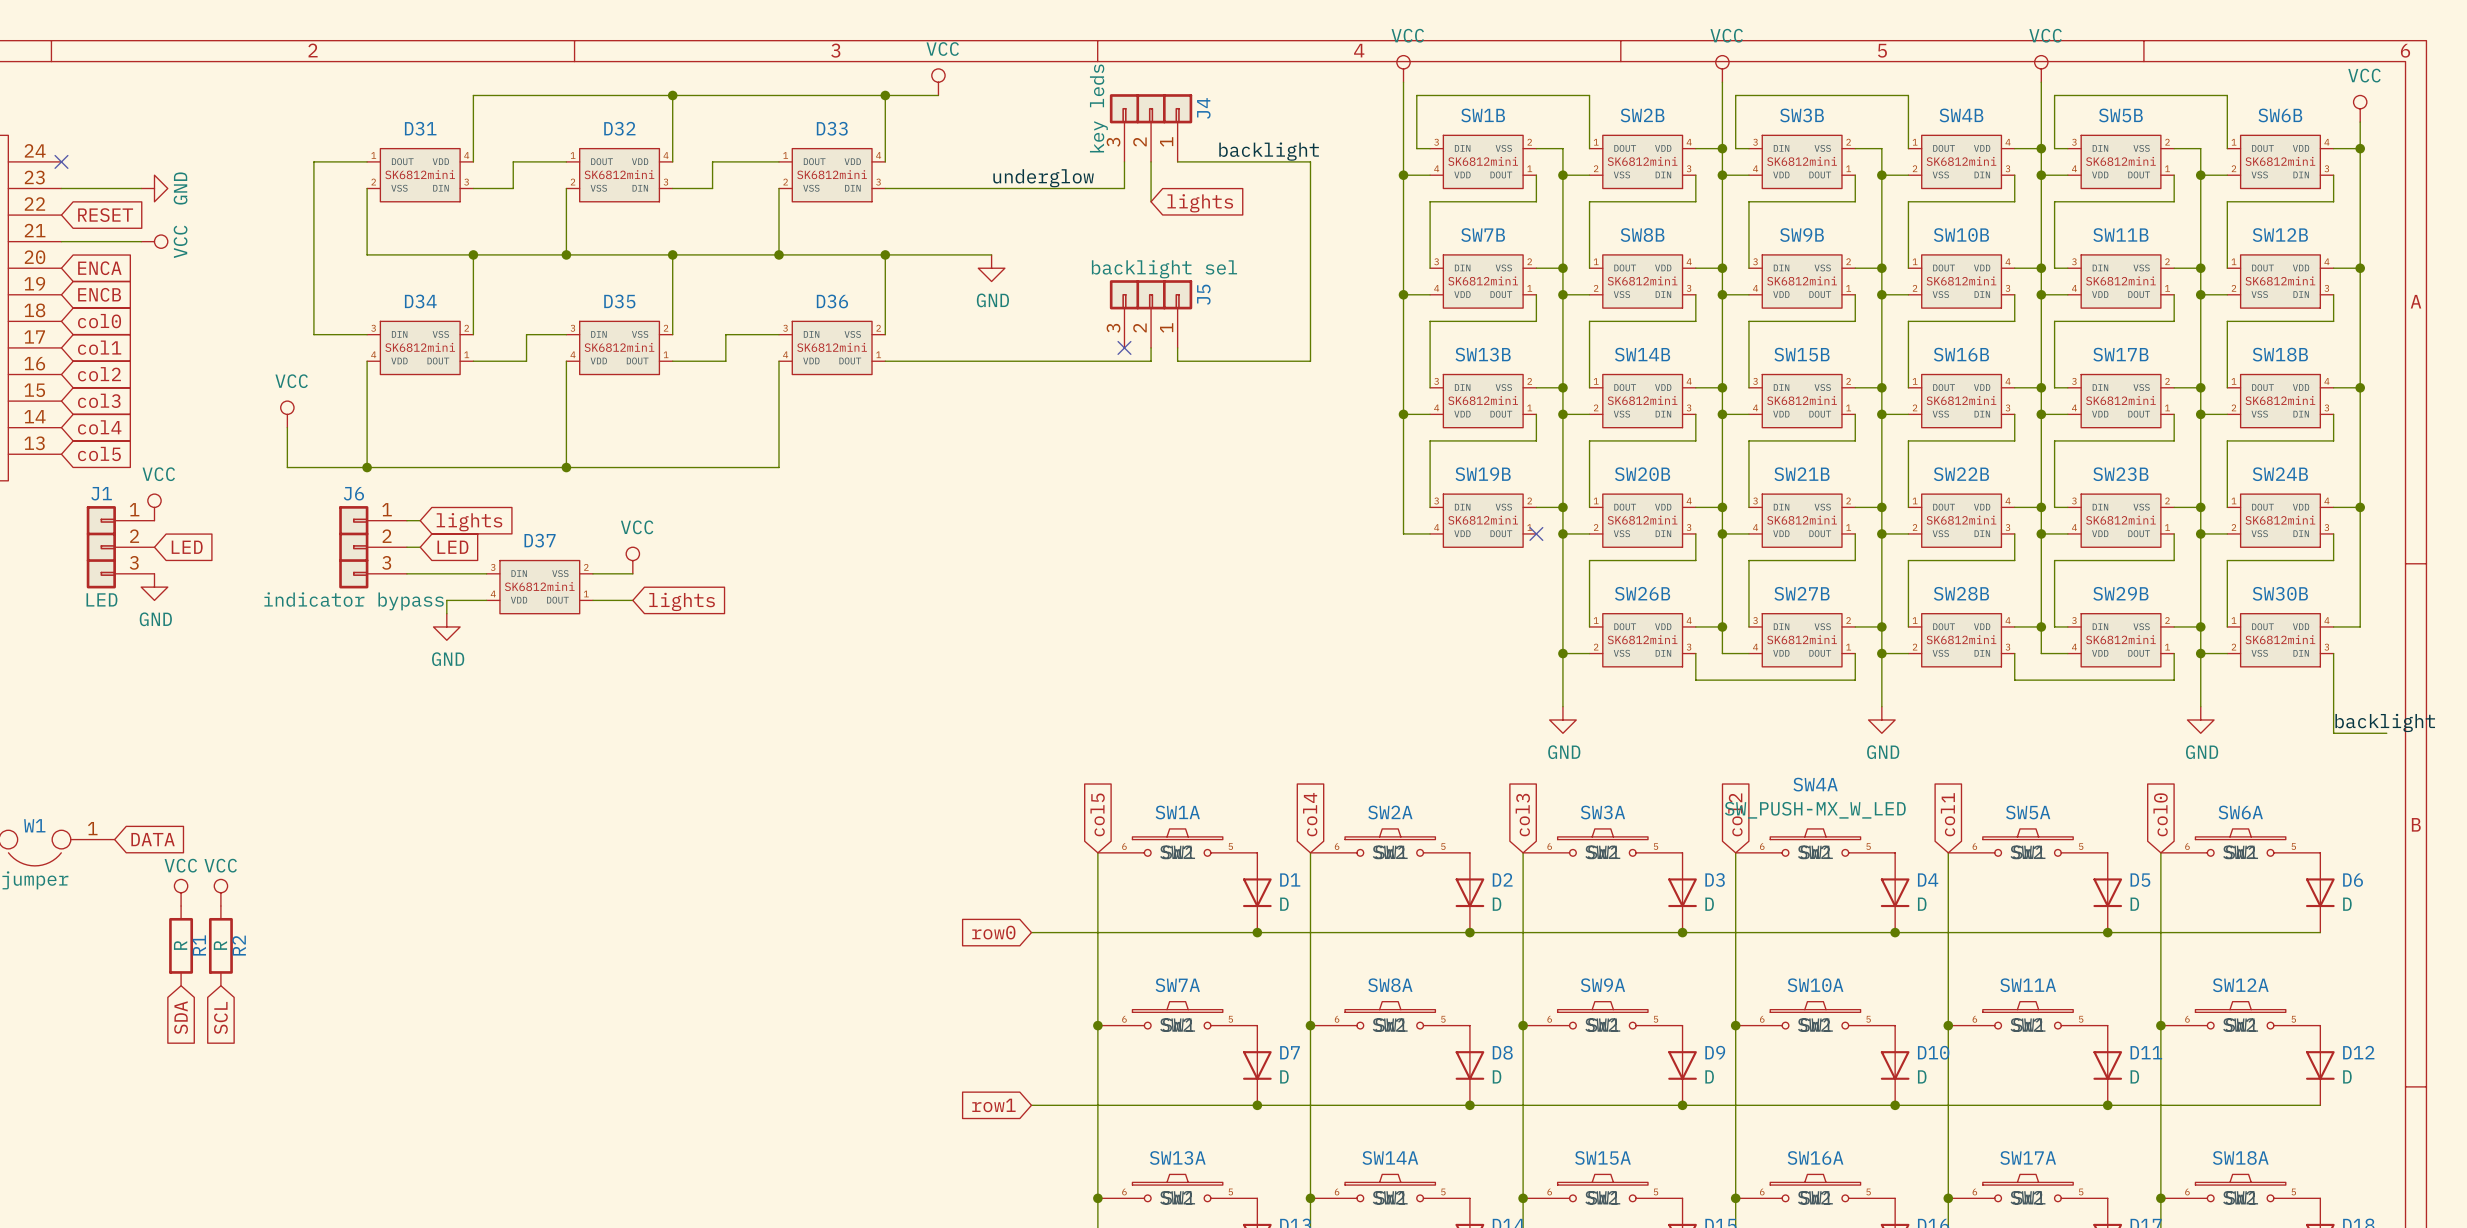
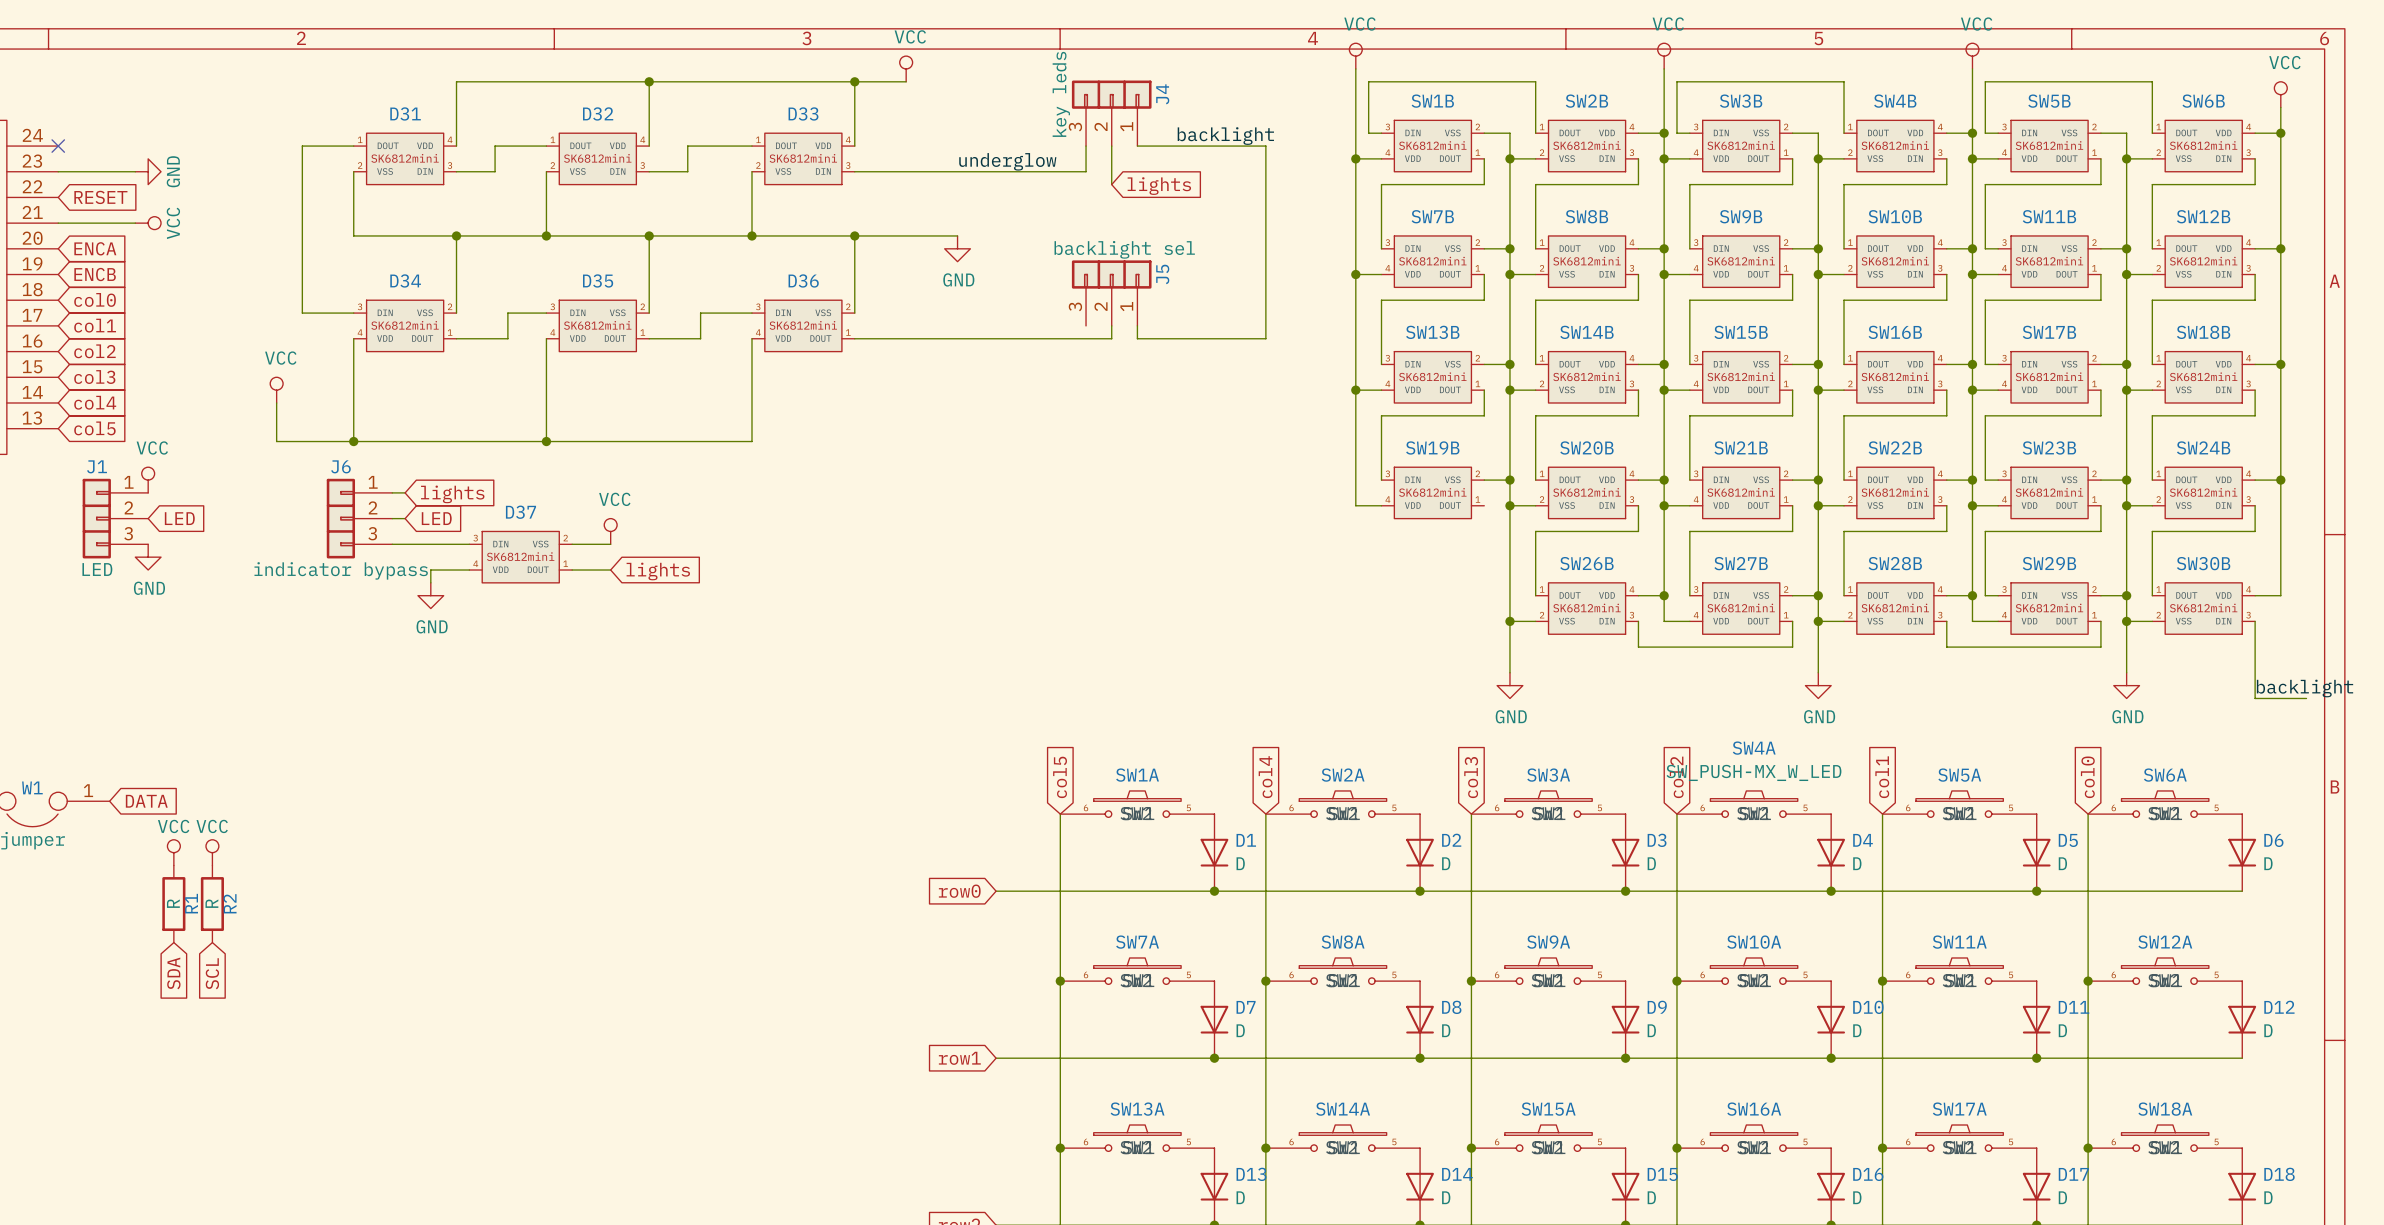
no-connect mark: (1124, 347) -> none
no-connect mark: (1536, 533) -> none

